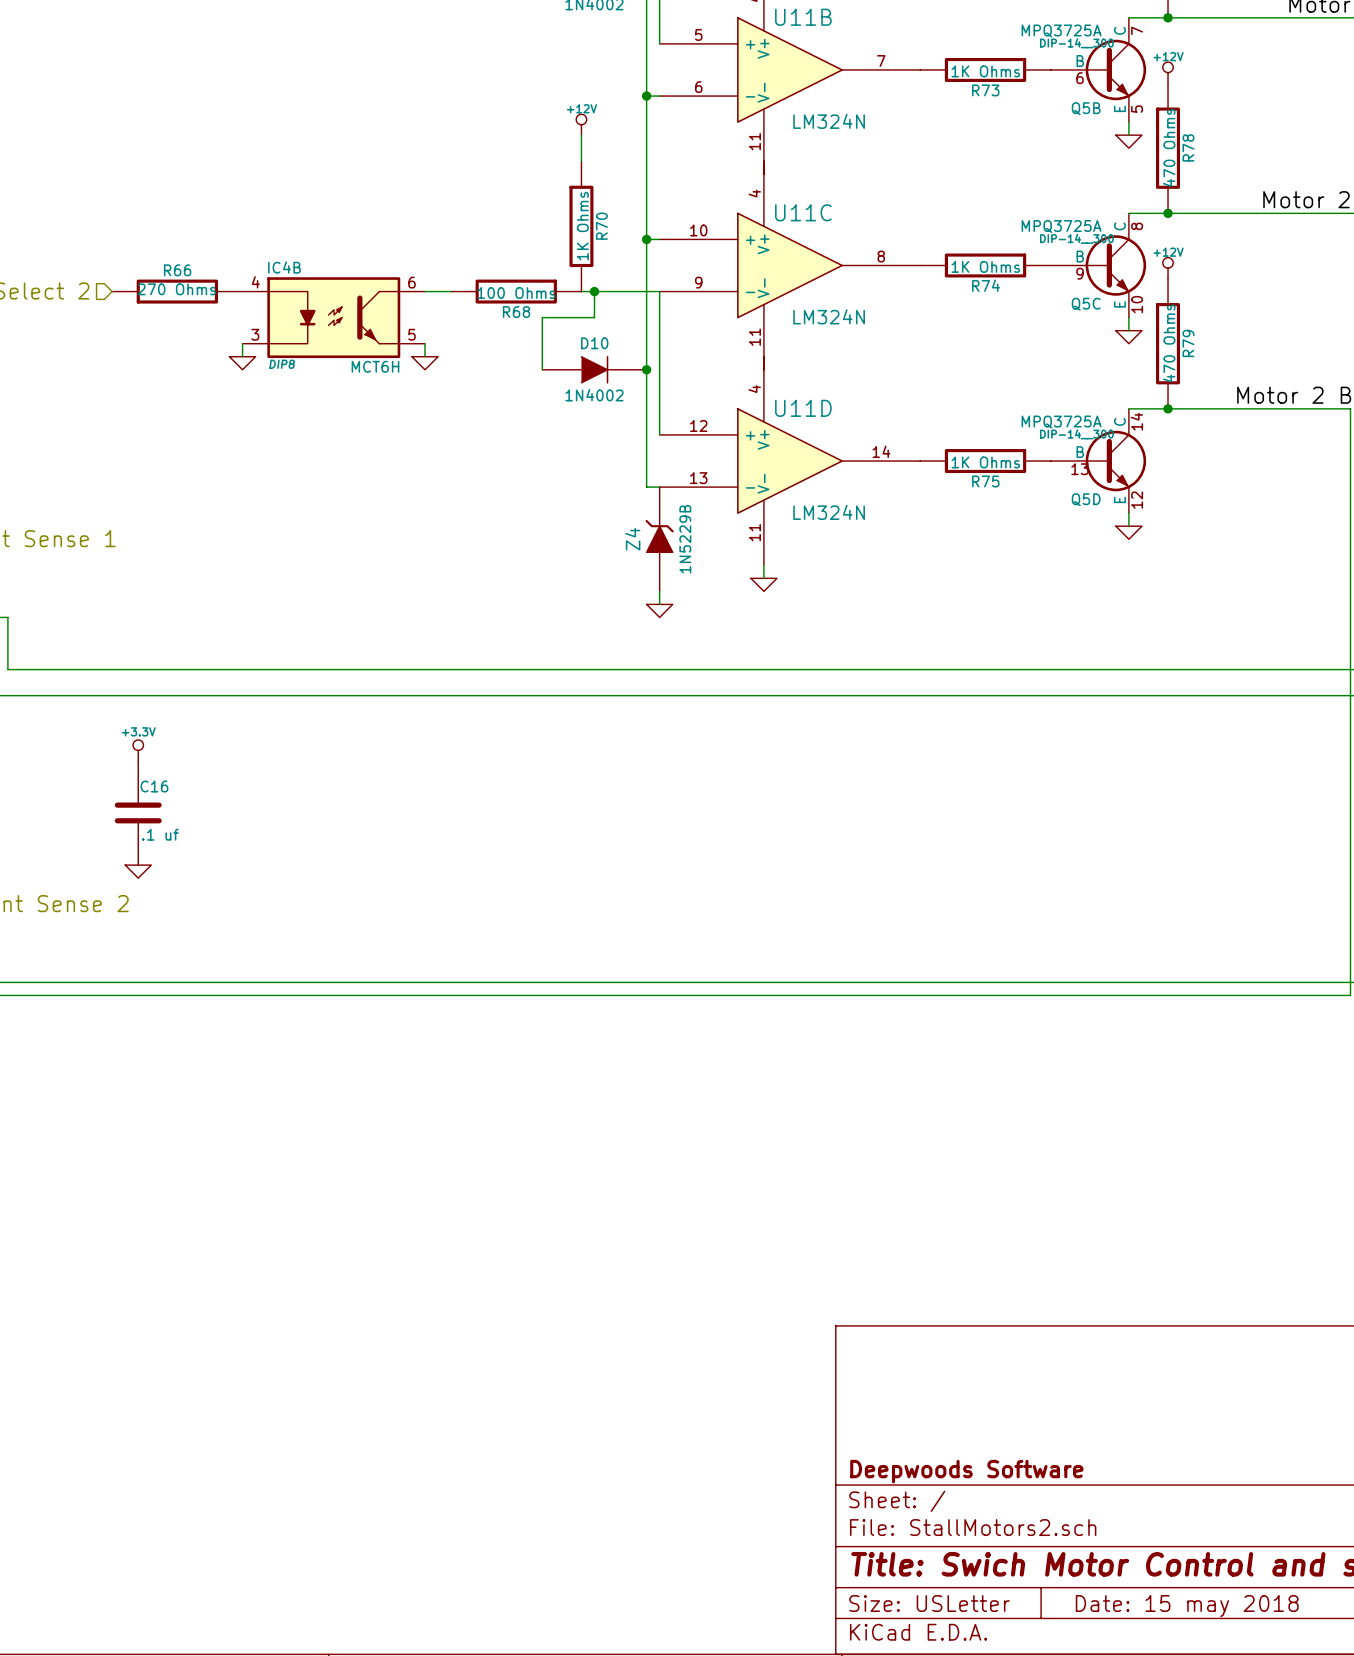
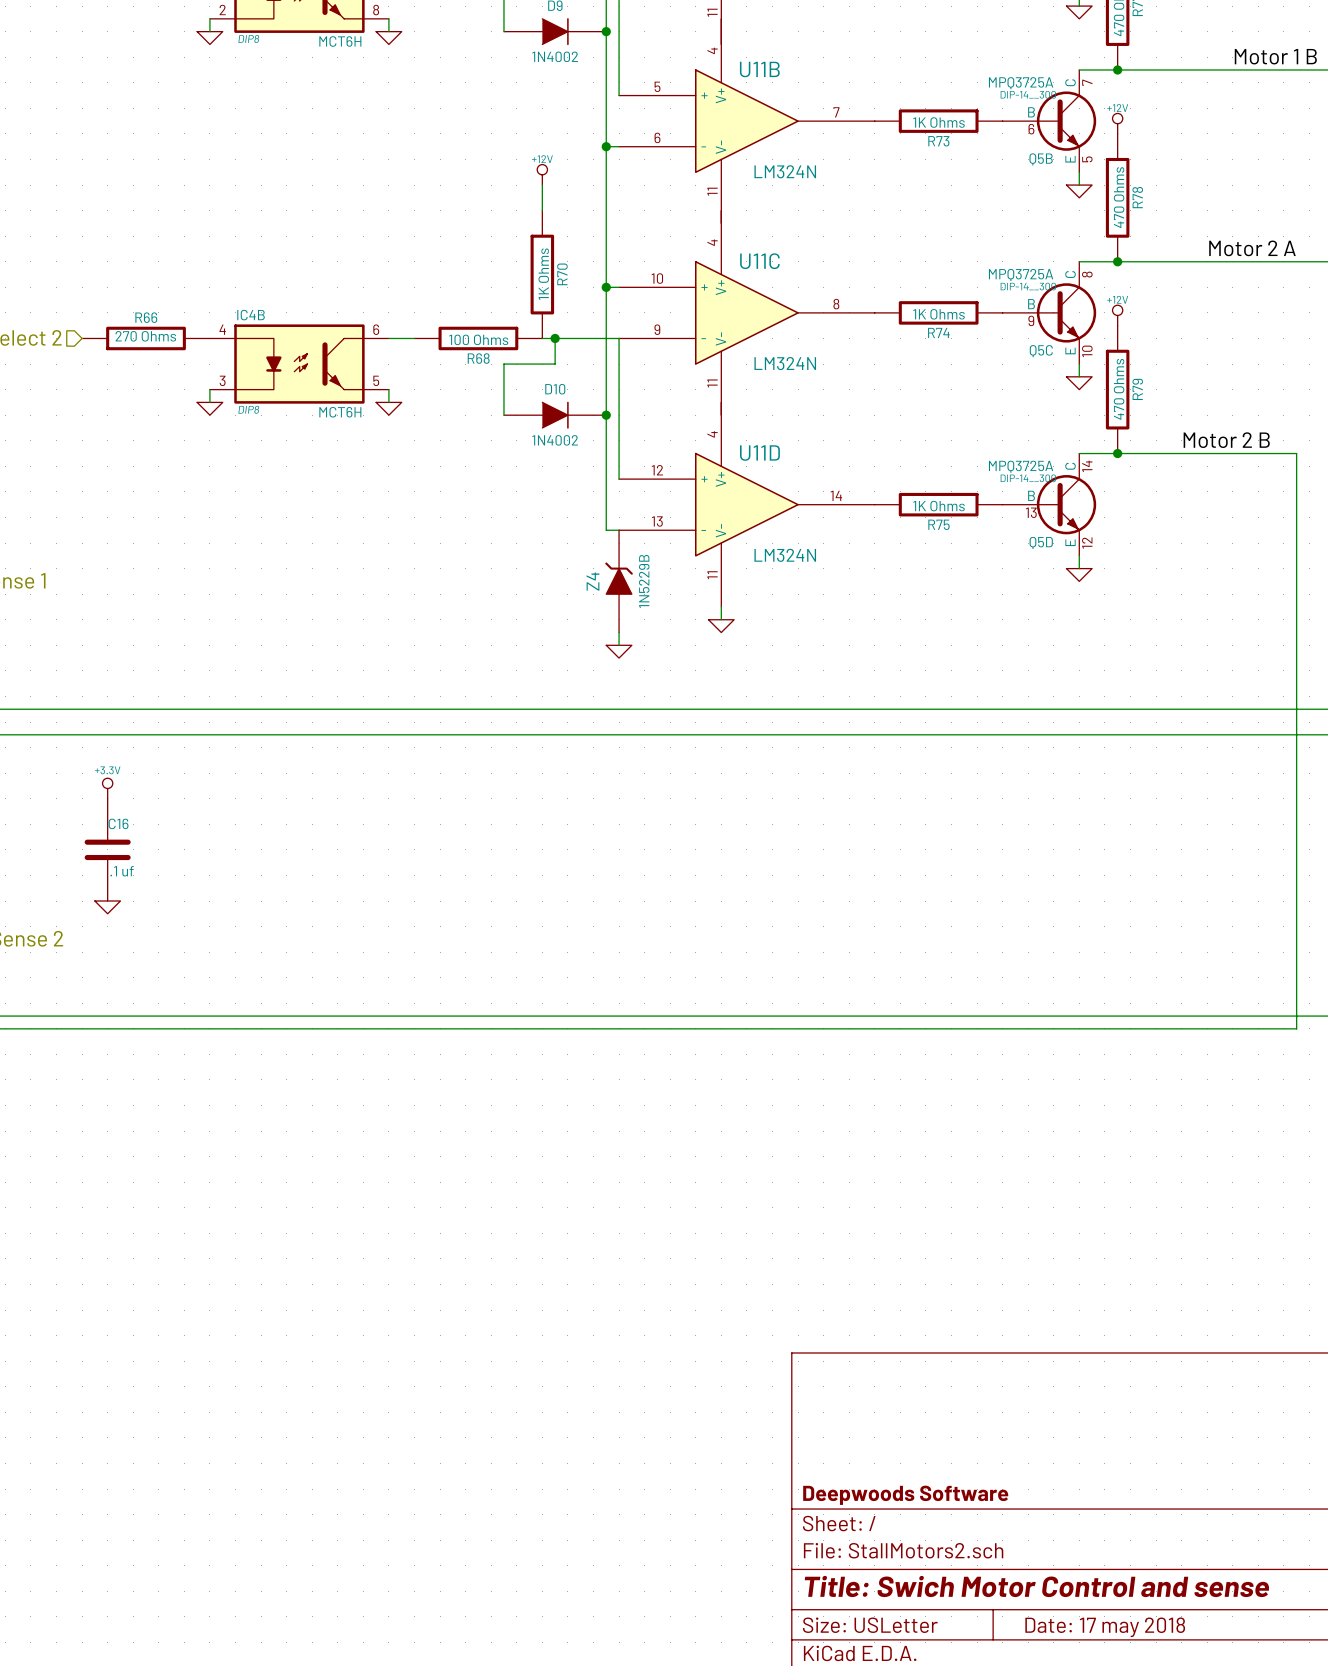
title block: Date: 15 may 2018 (1187, 1606) -> Date: 17 may 2018 (1105, 1627)

